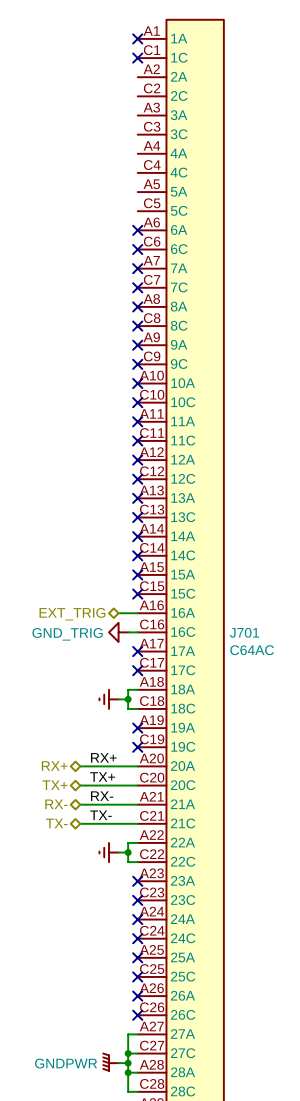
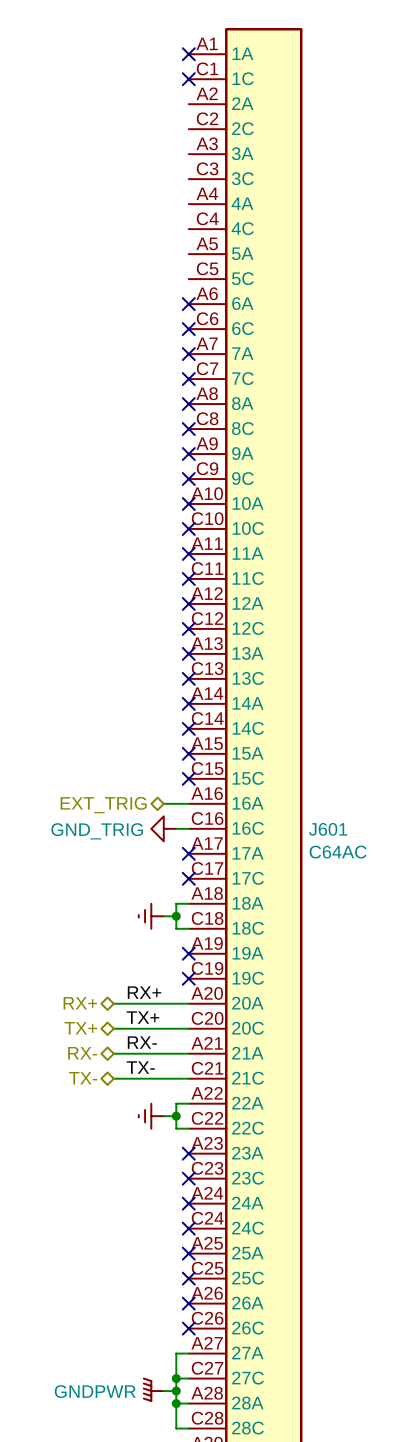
J701 name: J701 (244, 632) -> J601 (328, 829)

